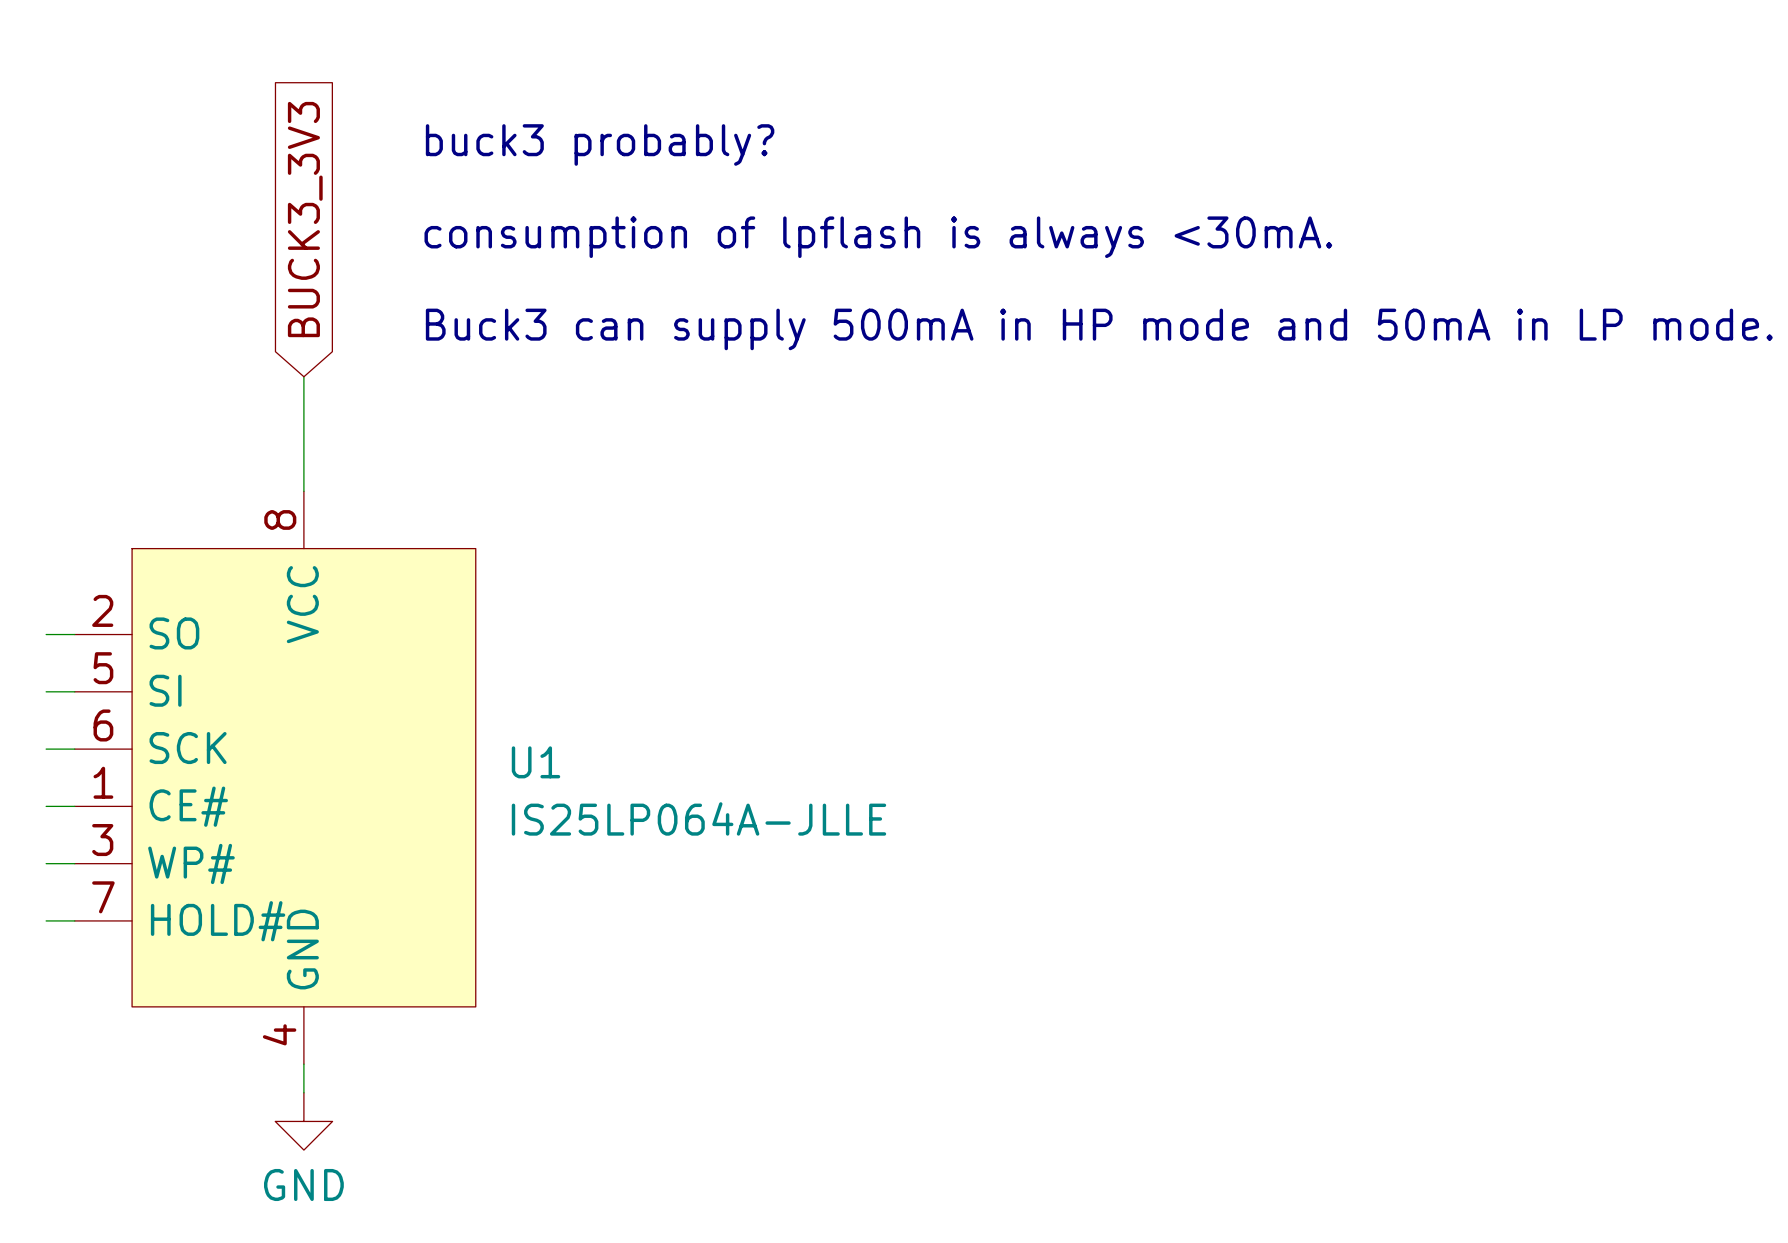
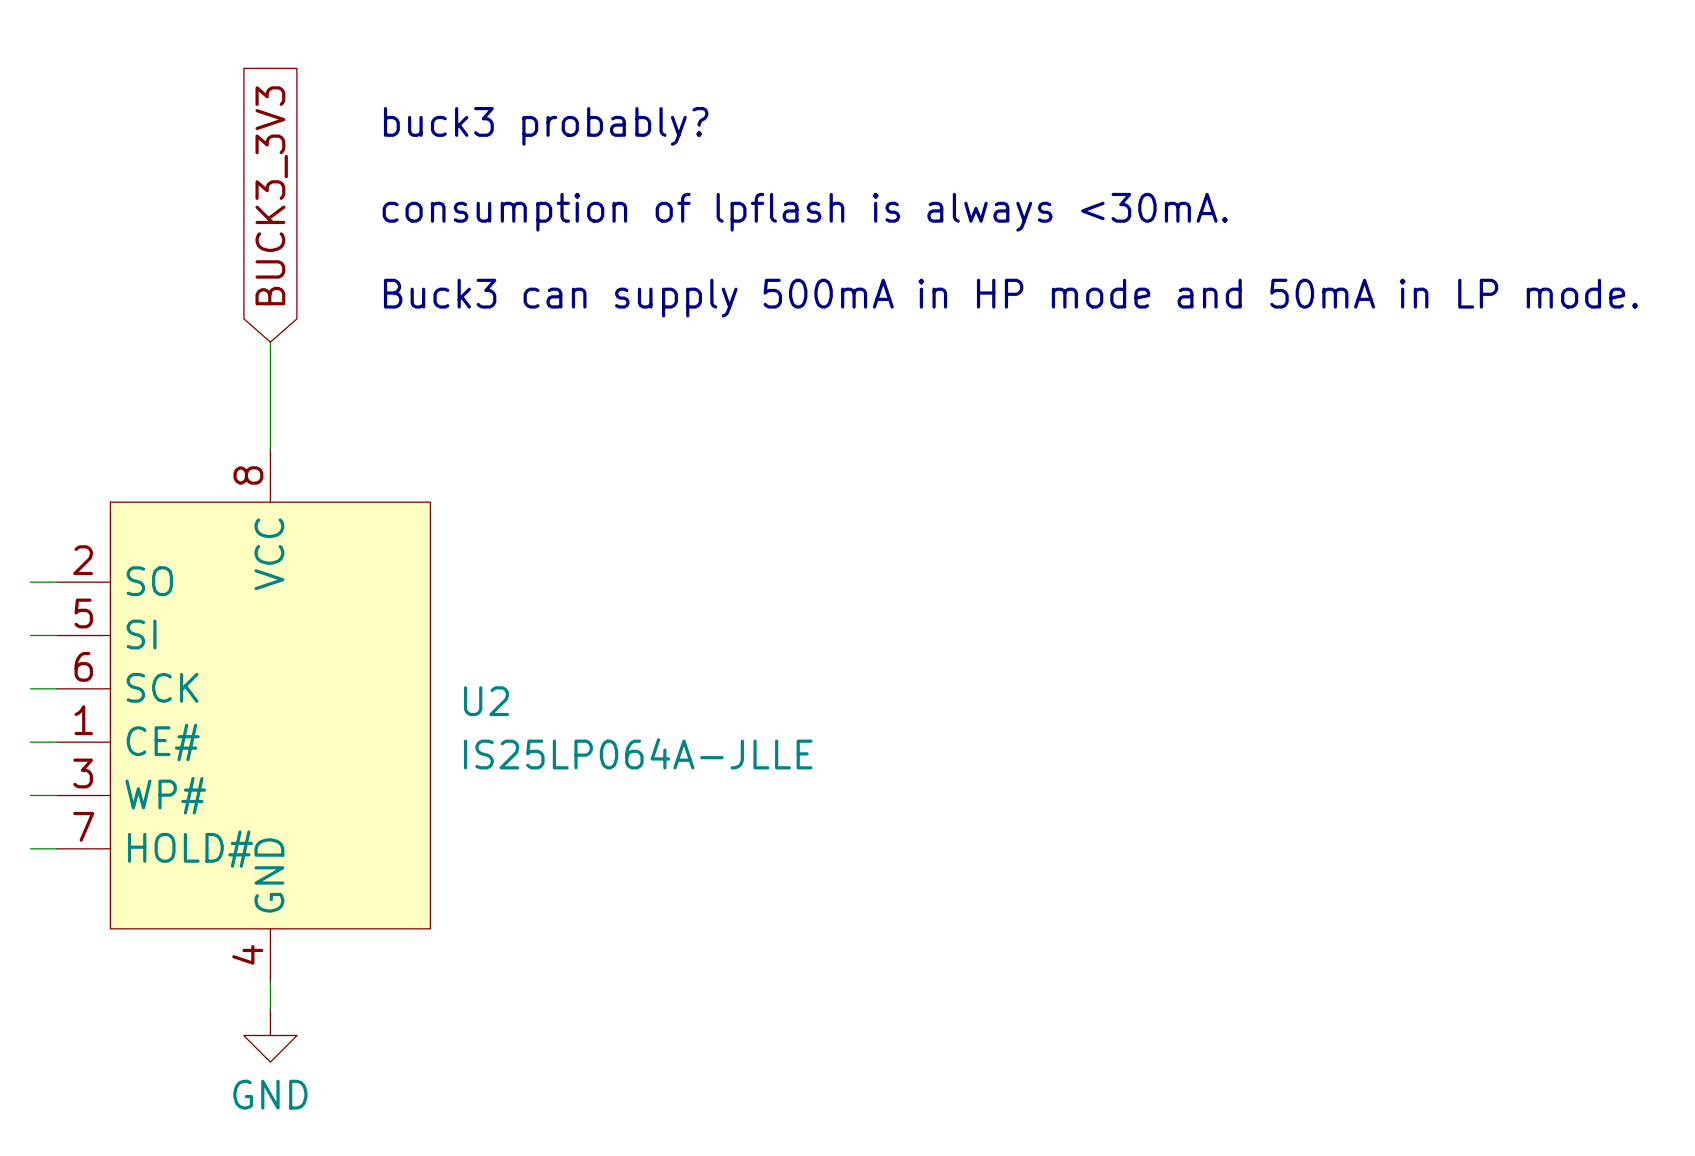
U1 name: U1 (535, 762) -> U2 (486, 701)

